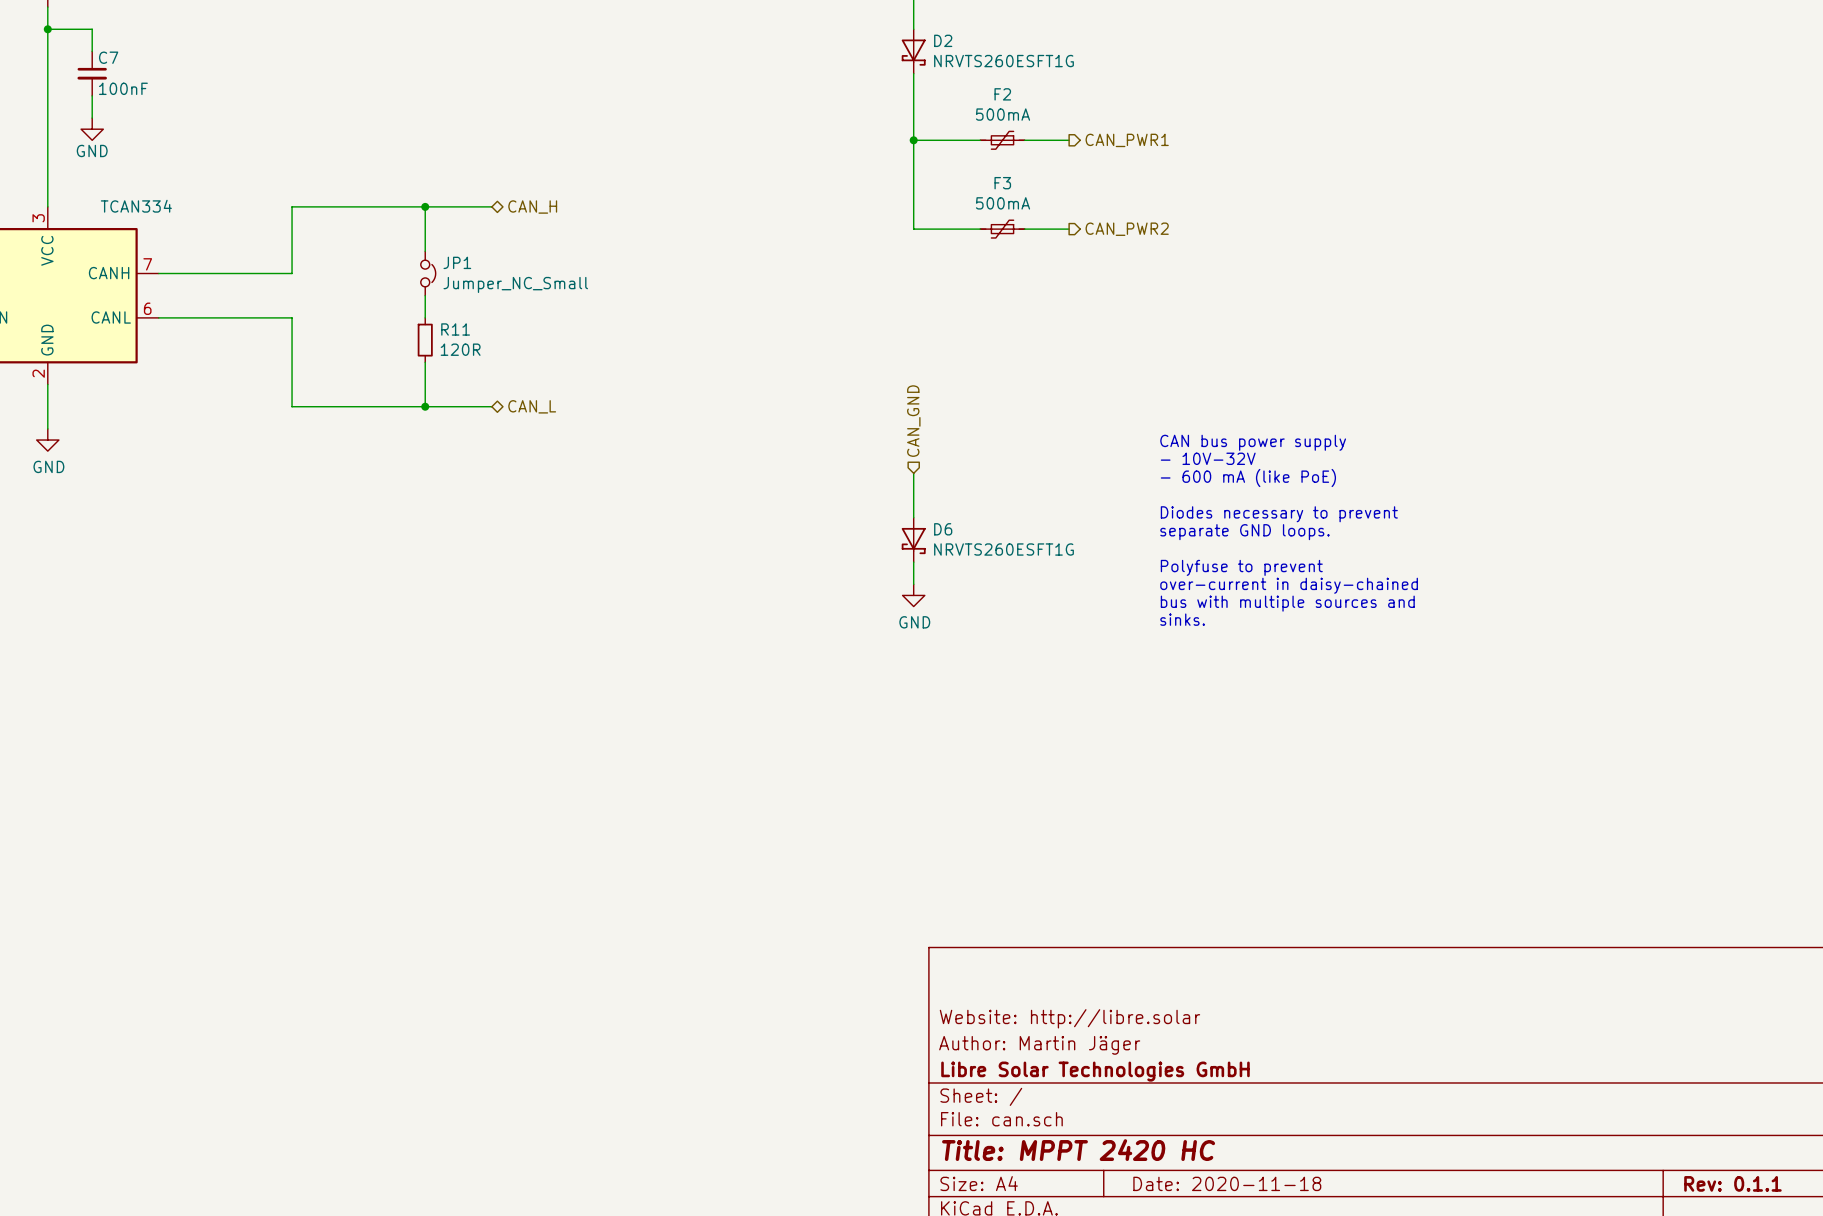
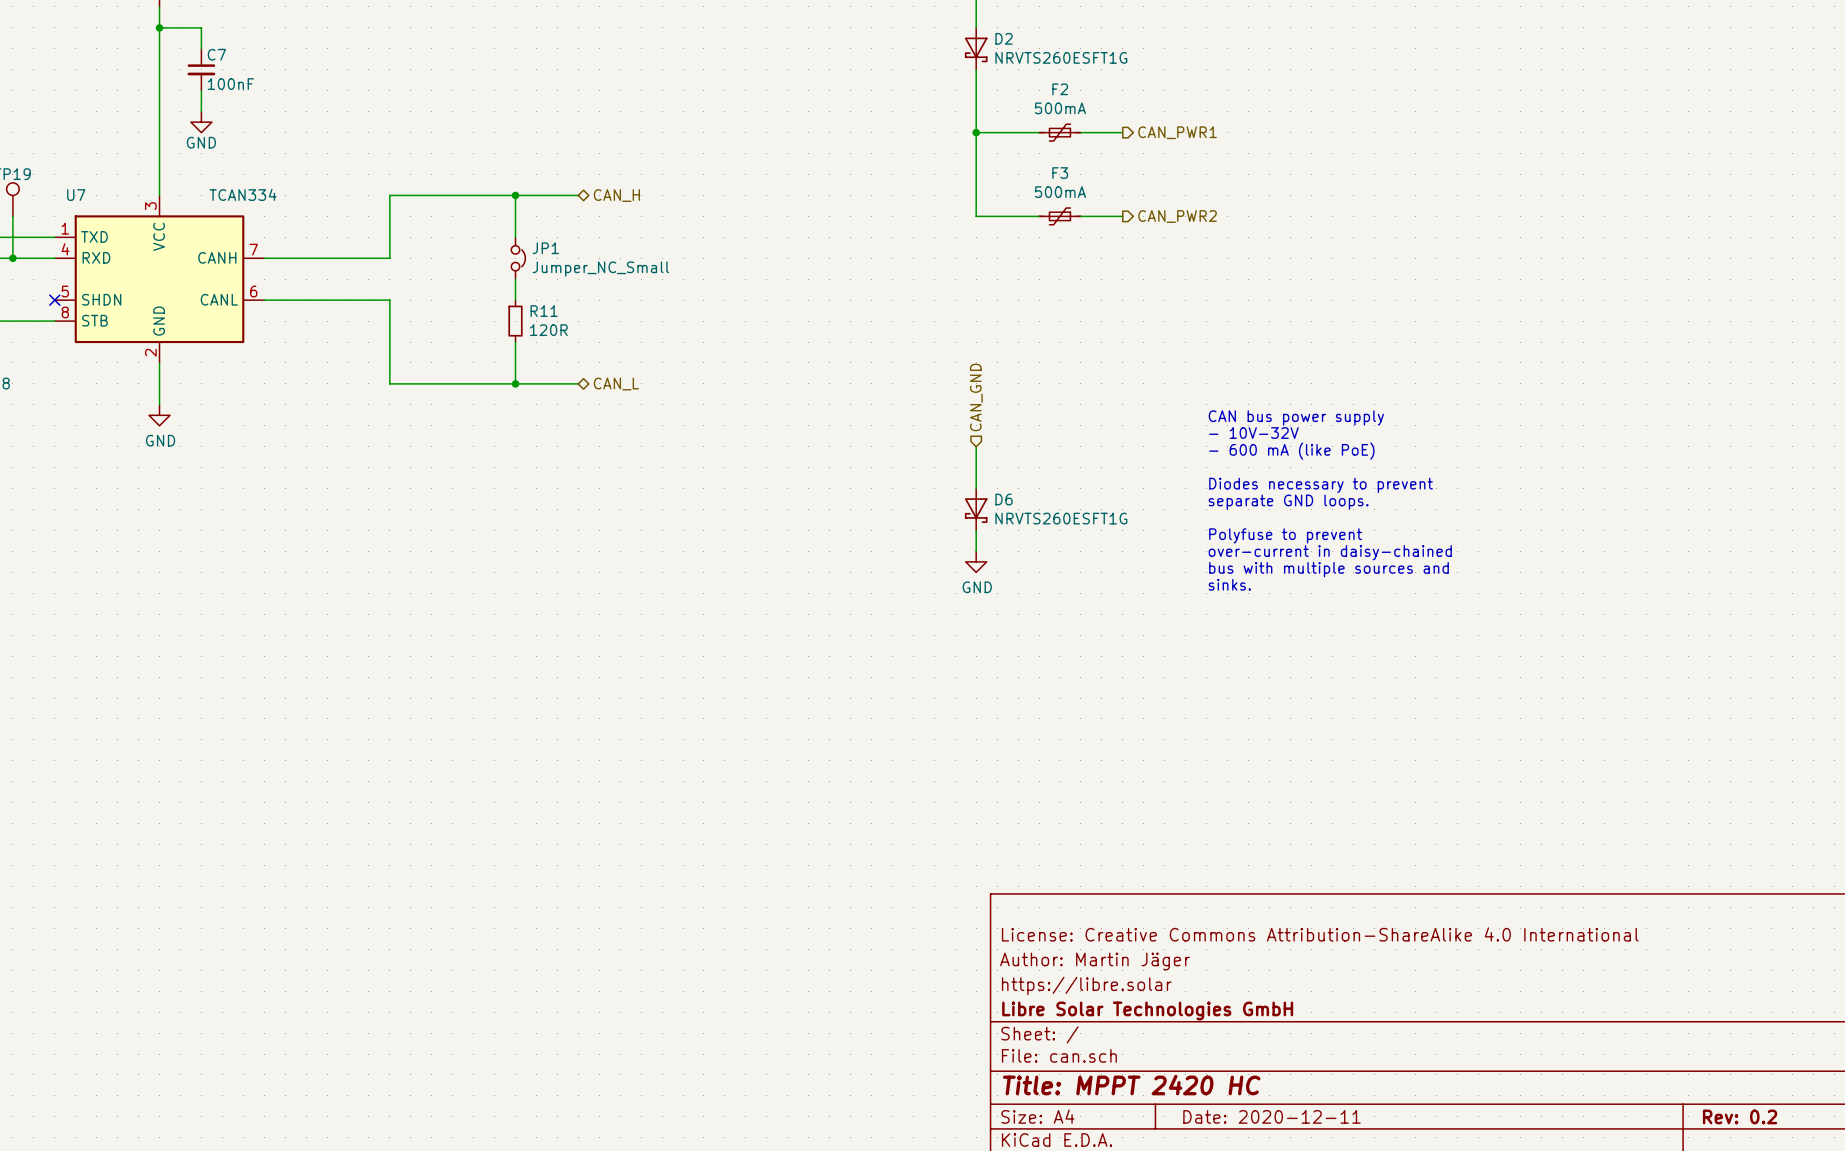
title block: none -> License: Creative Commons Attribution-ShareAlike 4.0 International (1320, 934)
title block: Website: http://libre.solar (1069, 1018) -> Author: Martin Jäger (1095, 961)
title block: Author: Martin Jäger (1039, 1045) -> https://libre.solar (1086, 985)
title block: Date: 2020-11-18 (1227, 1183) -> Date: 2020-12-11 (1271, 1116)
title block: Rev: 0.1.1 (1732, 1183) -> Rev: 0.2 (1740, 1116)

